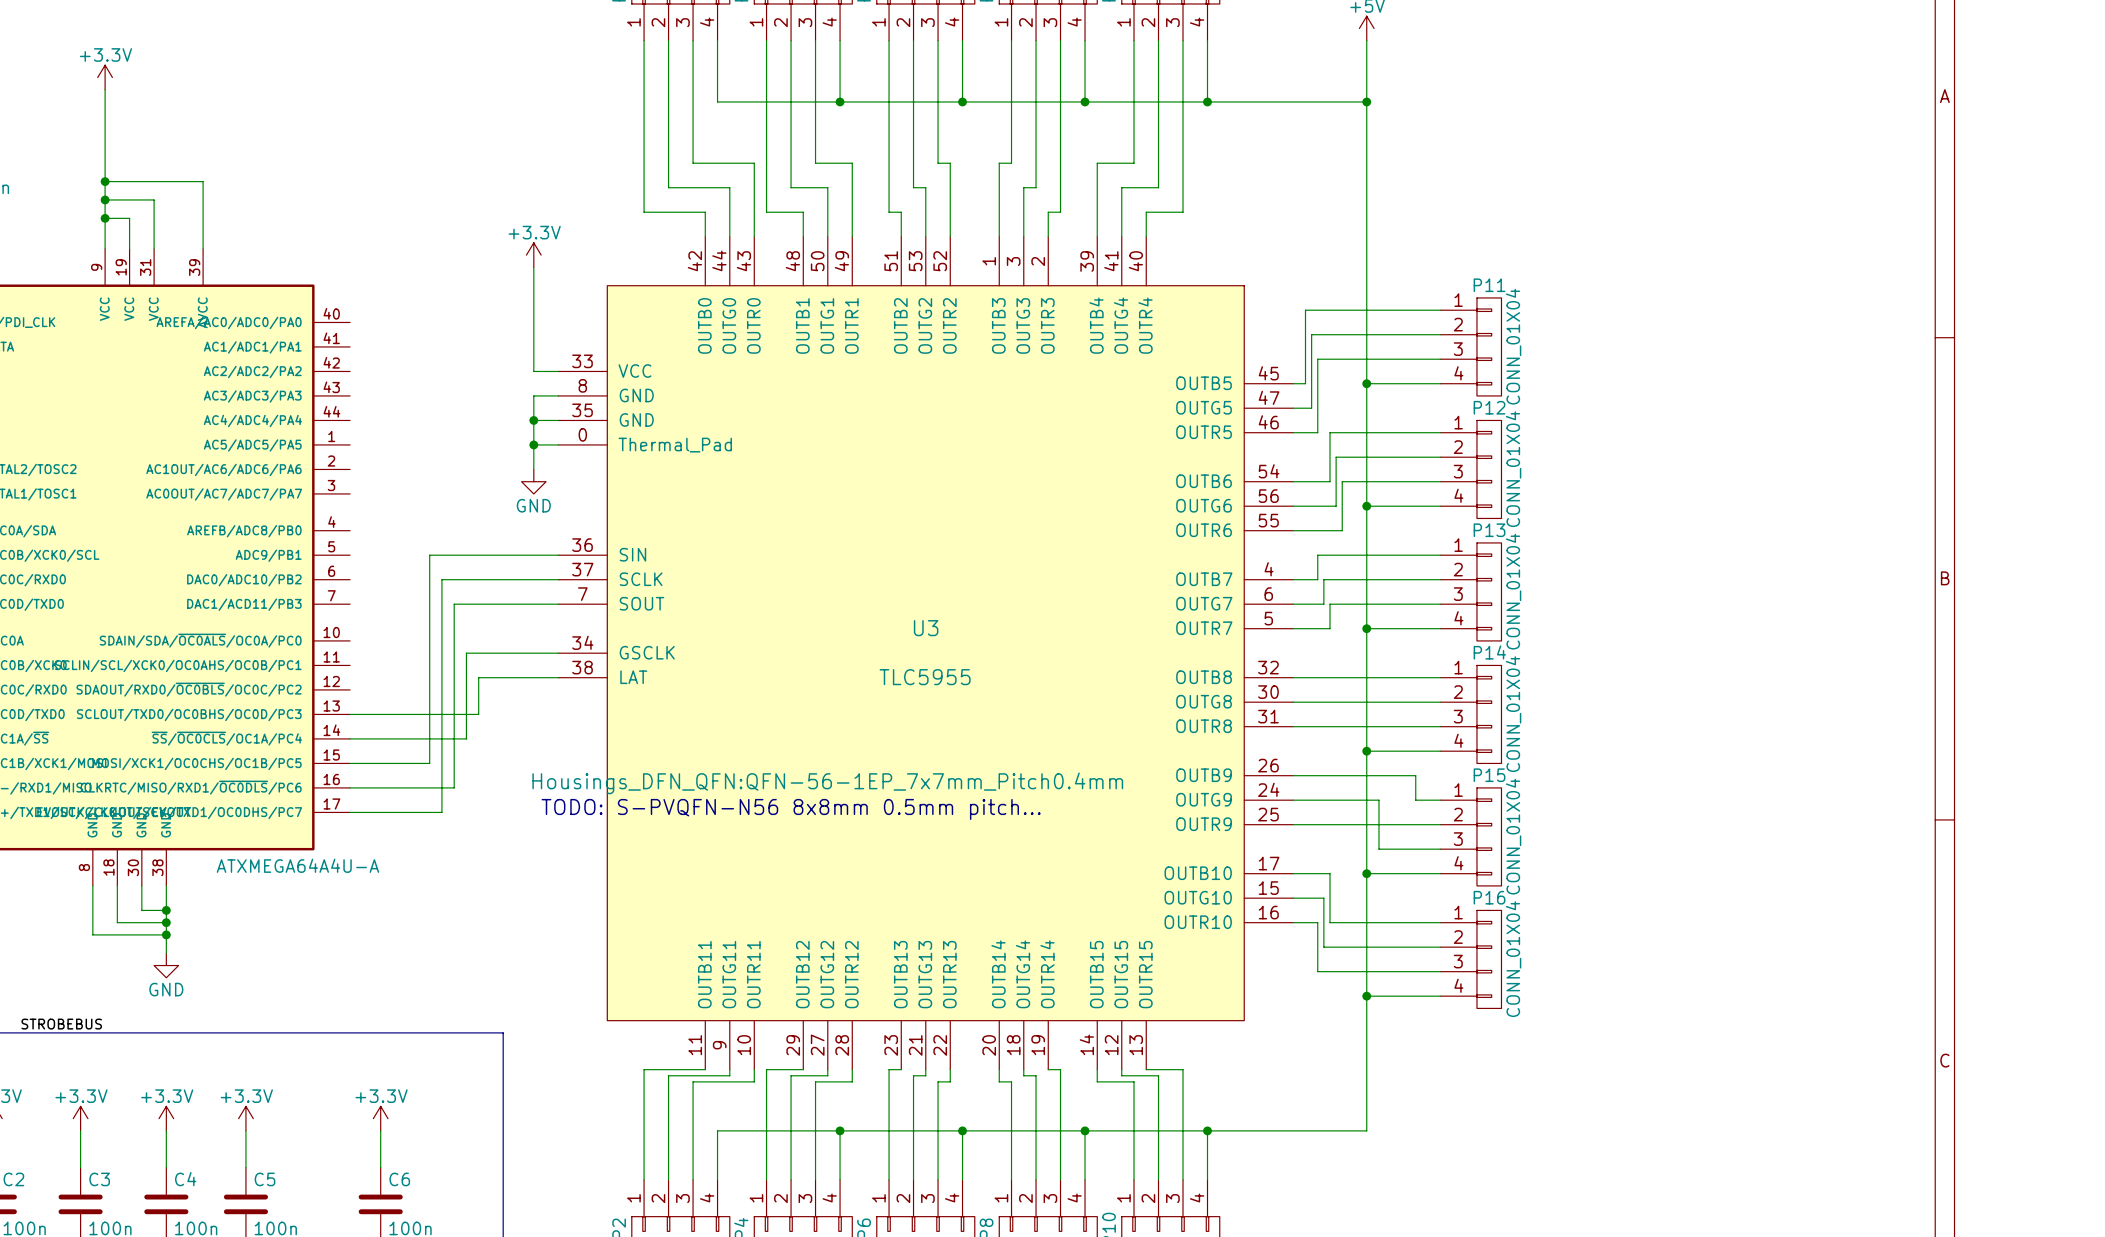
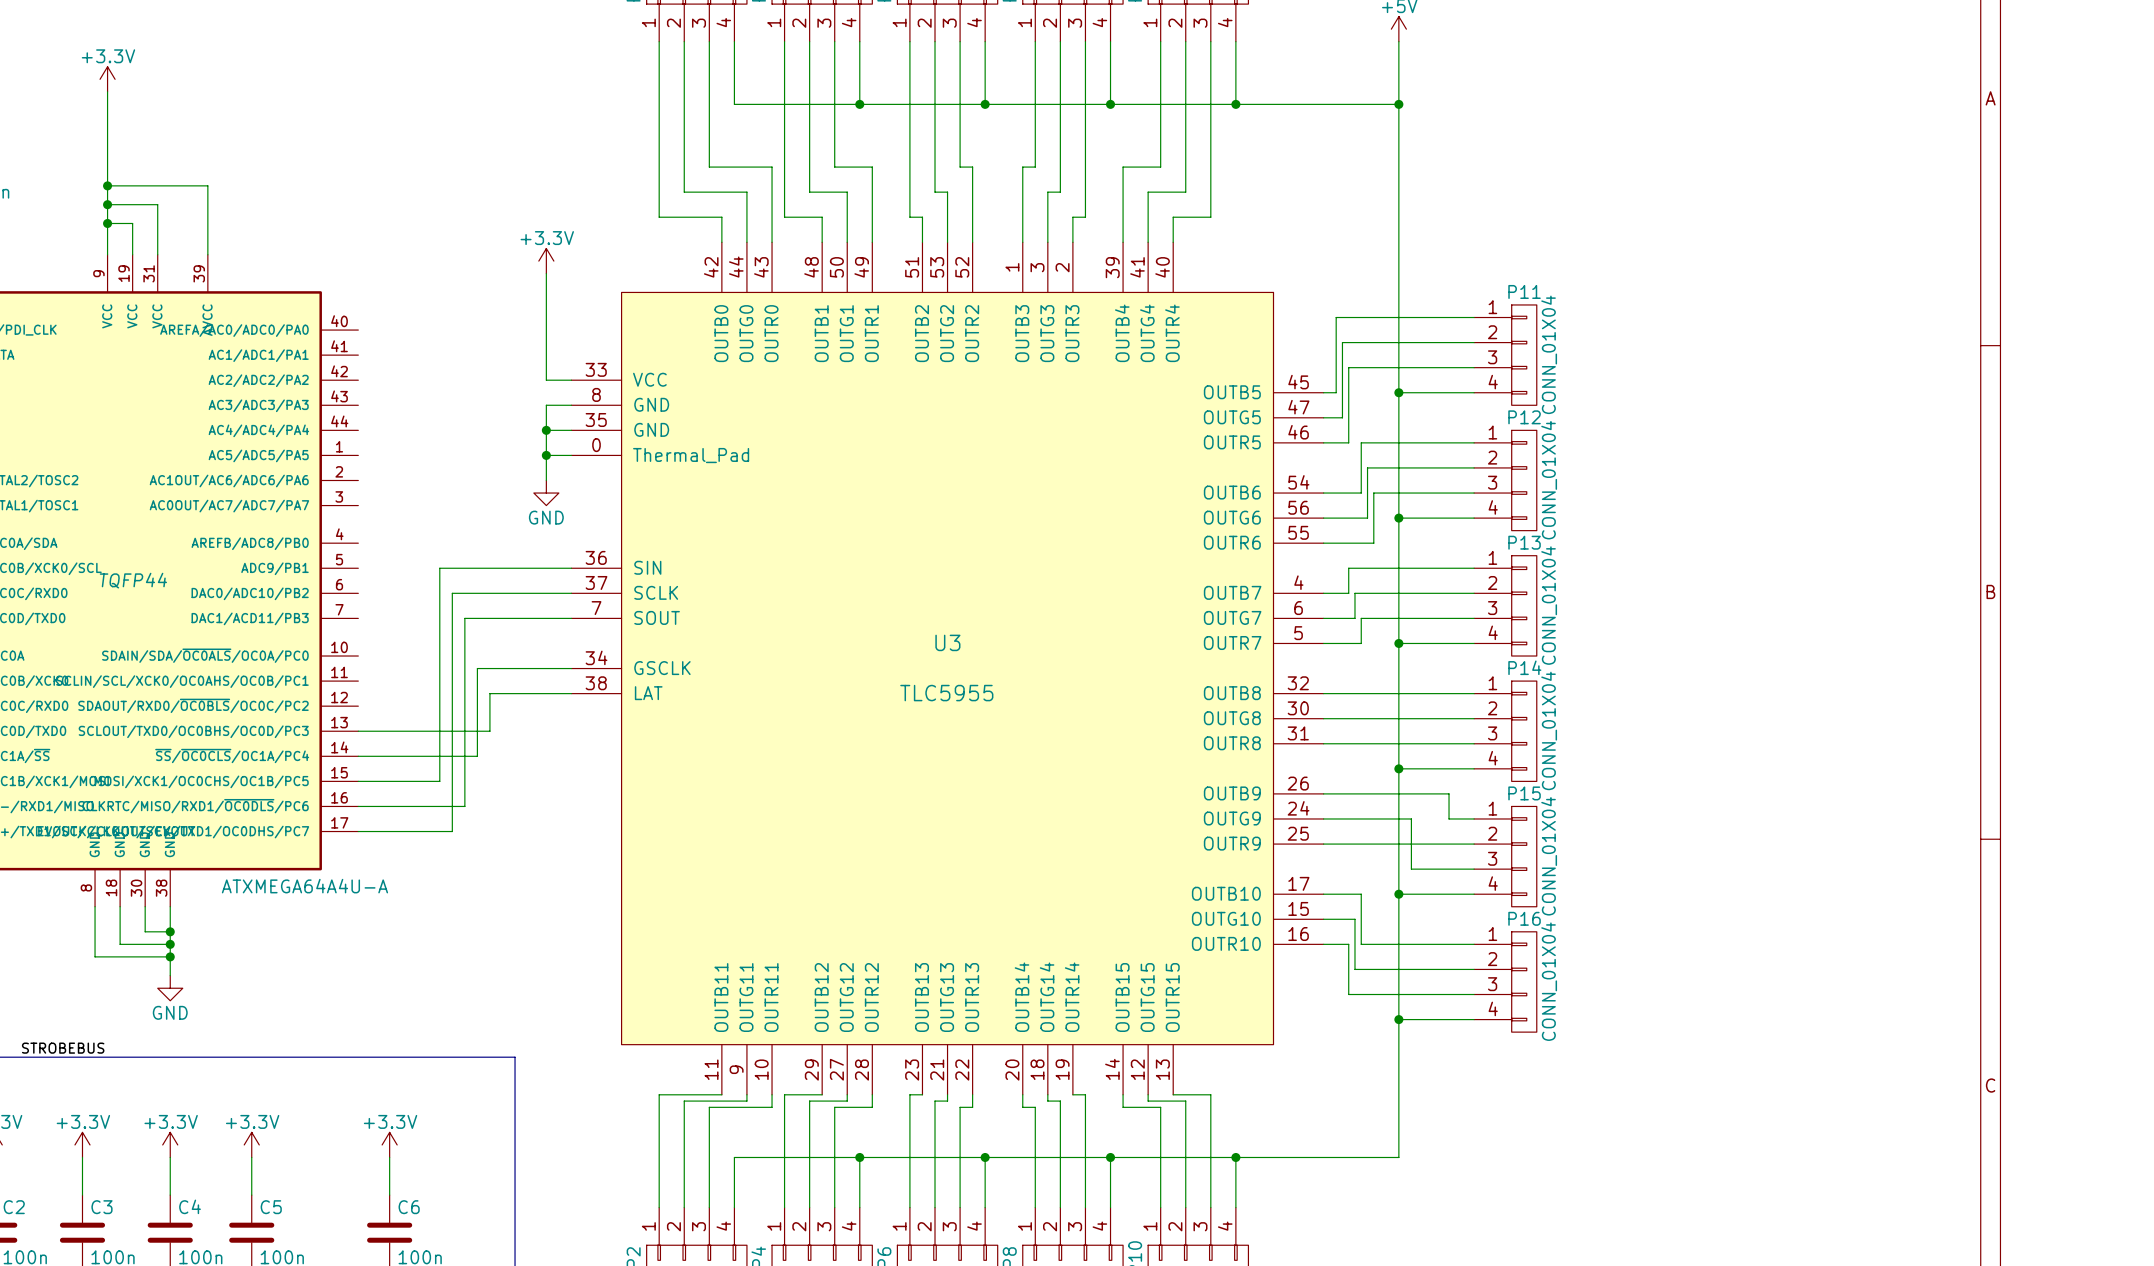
part text: none -> TQFP44 (133, 580)
U3 text: Housings_DFN_QFN:QFN-56-1EP_7x7mm_Pitch0.4mm (827, 783) -> none
text: TODO: S-PVQFN-N56 8x8mm 0.5mm pitch... (791, 809) -> none

